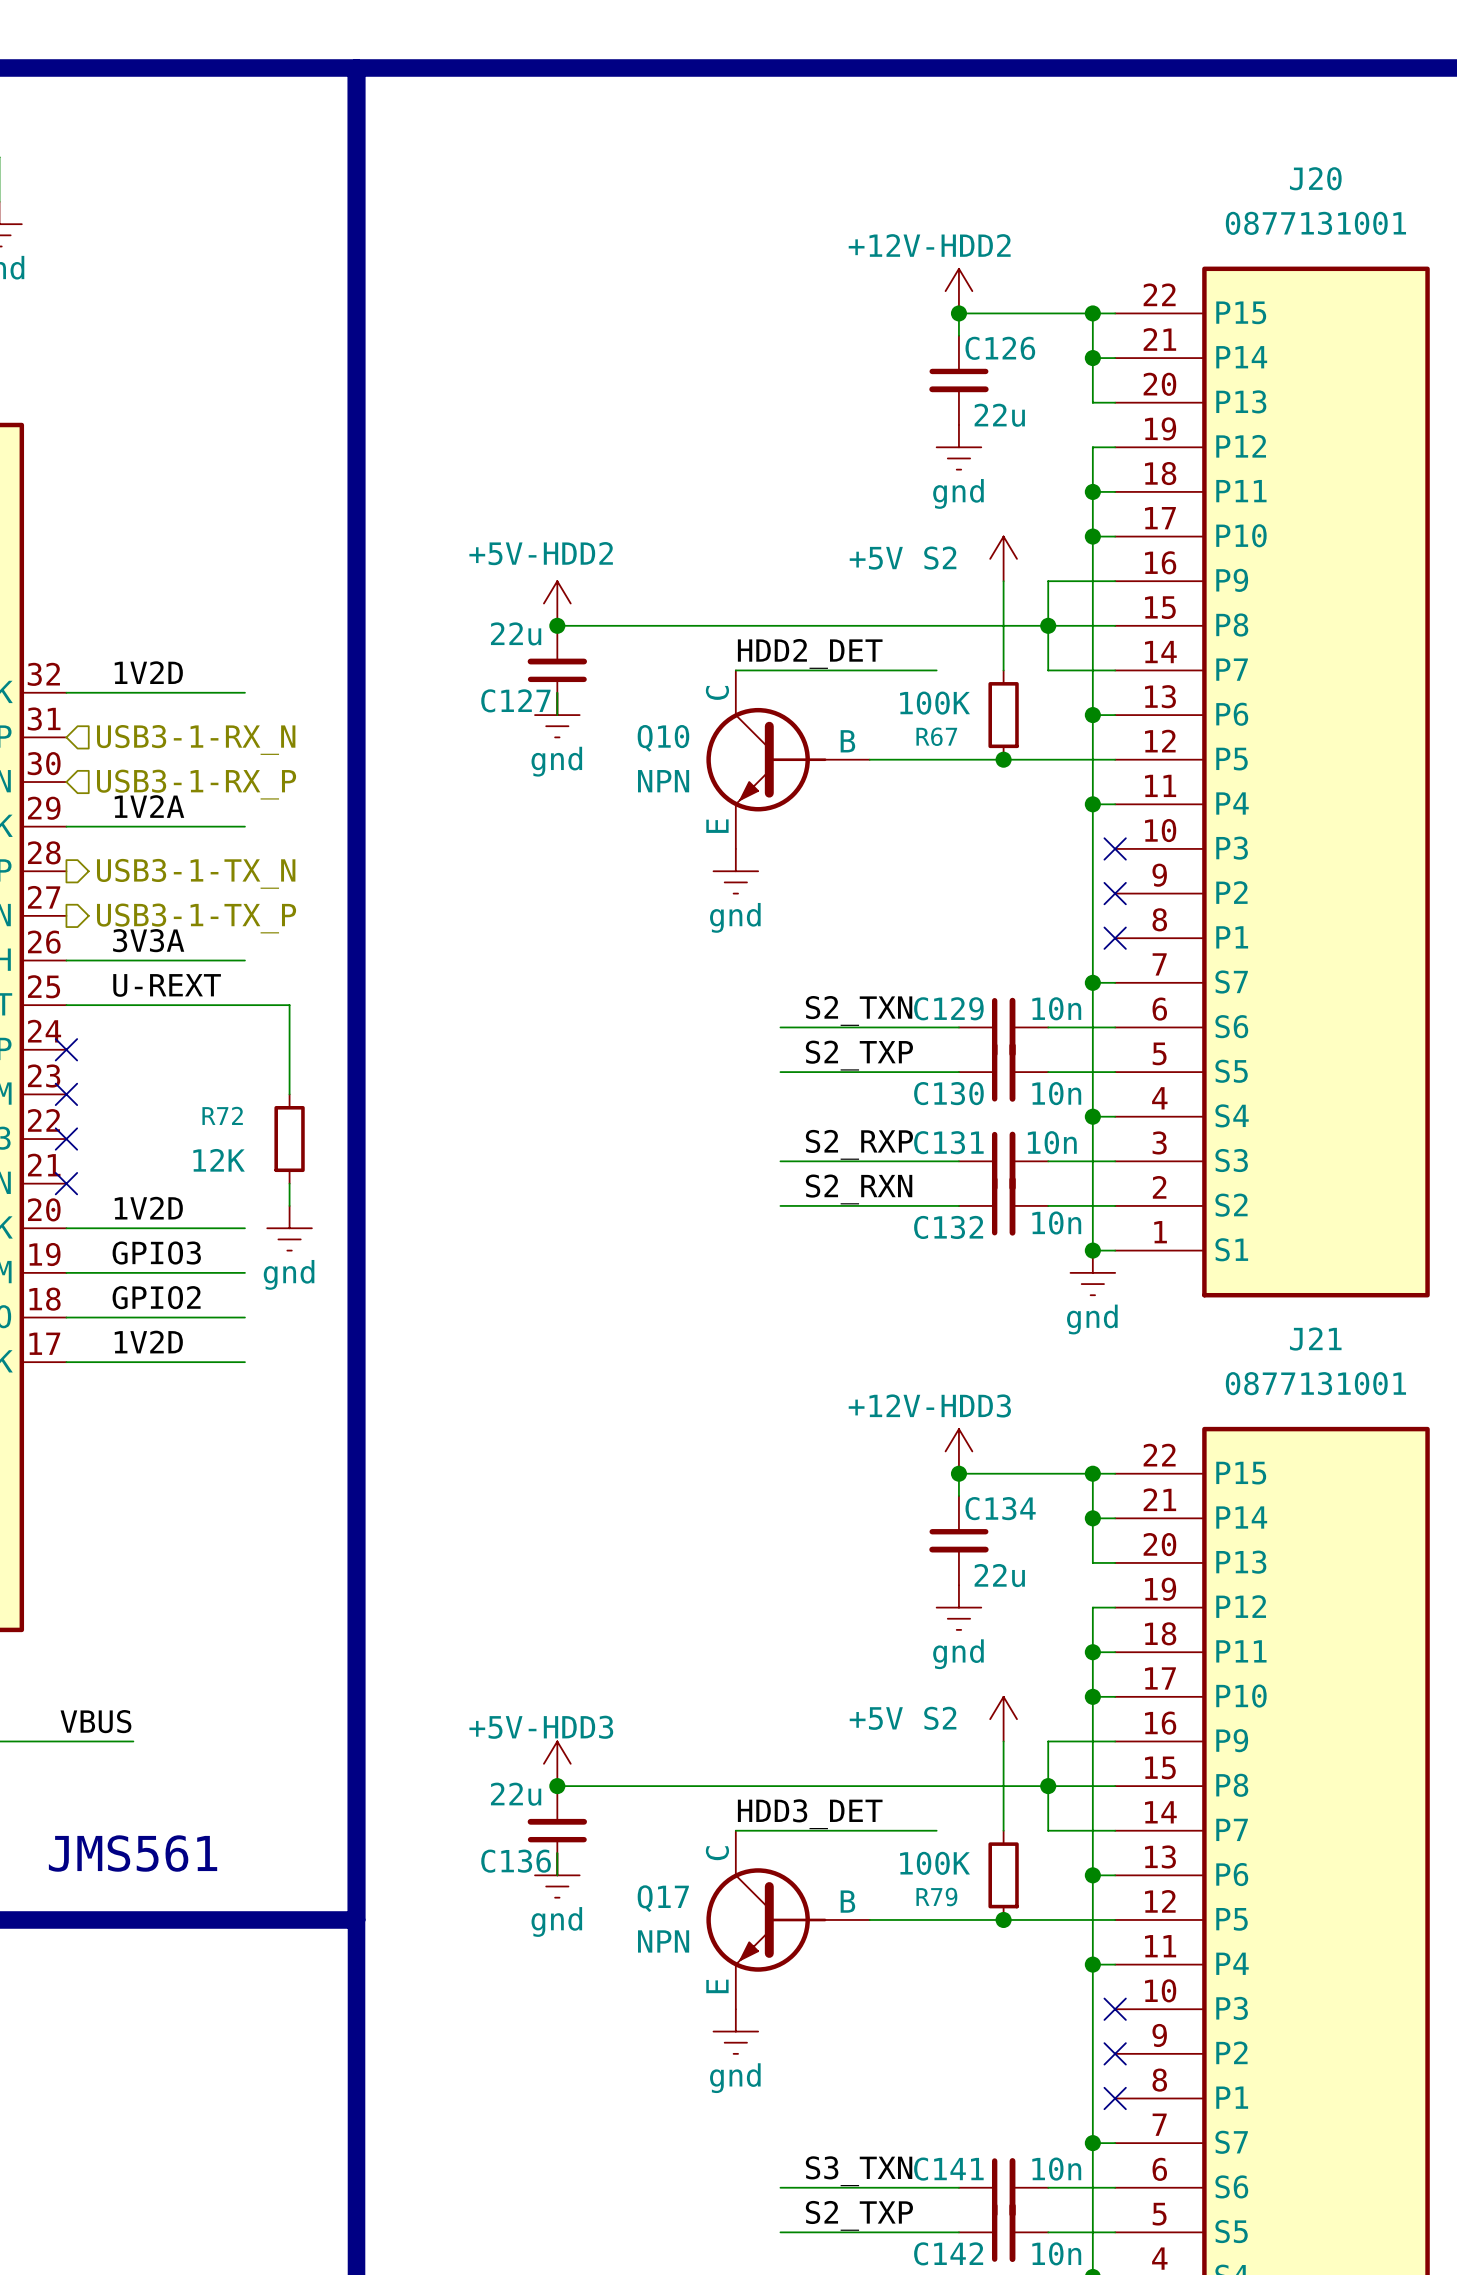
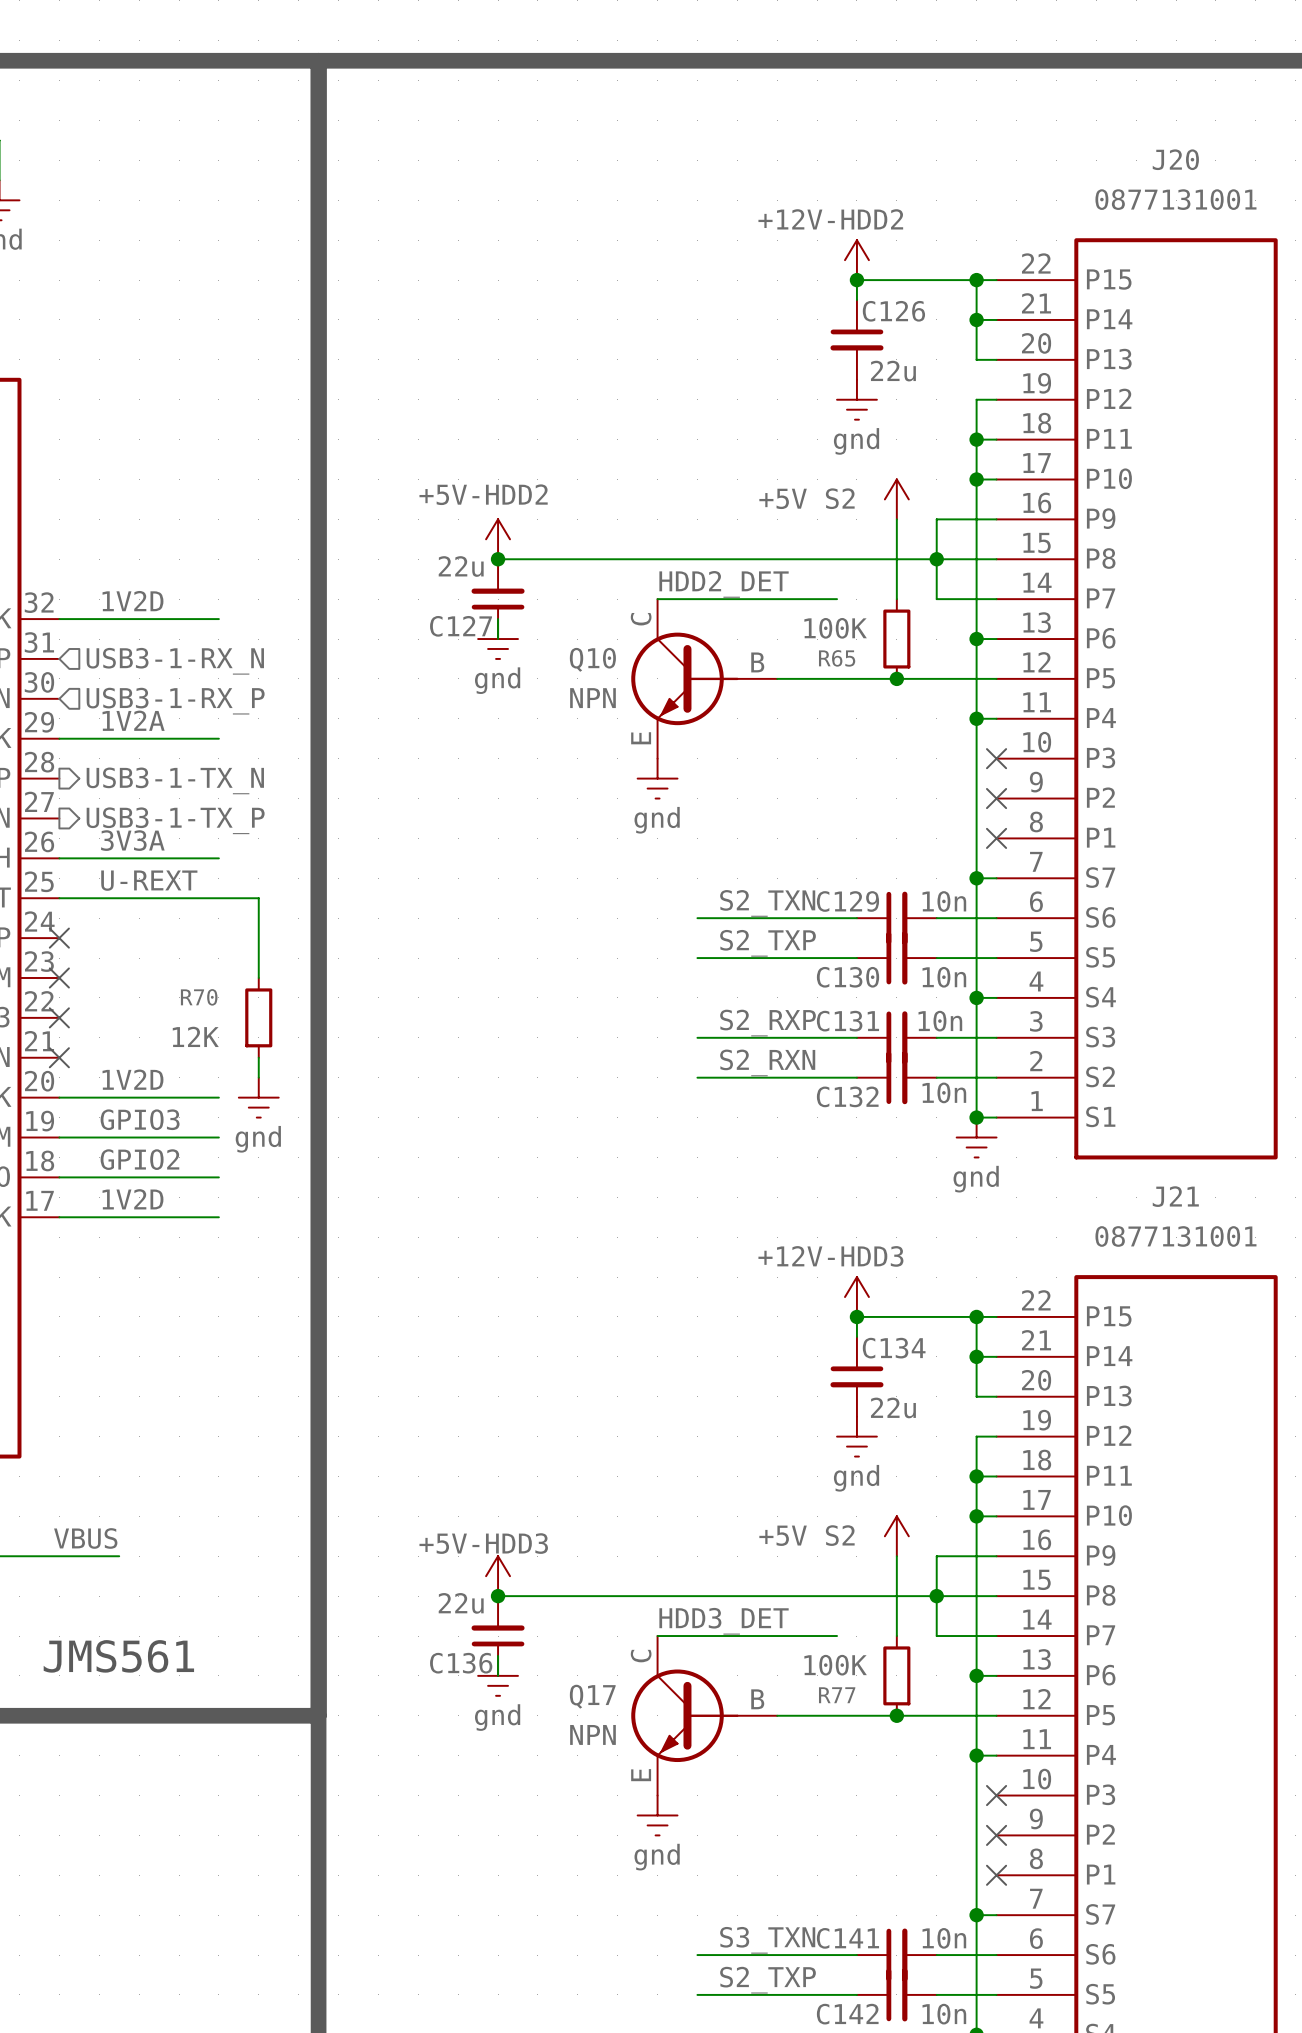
R67 name: R67 (936, 736) -> R65 (837, 658)
R72 name: R72 (222, 1115) -> R70 (199, 997)
R79 name: R79 (936, 1897) -> R77 (837, 1695)

